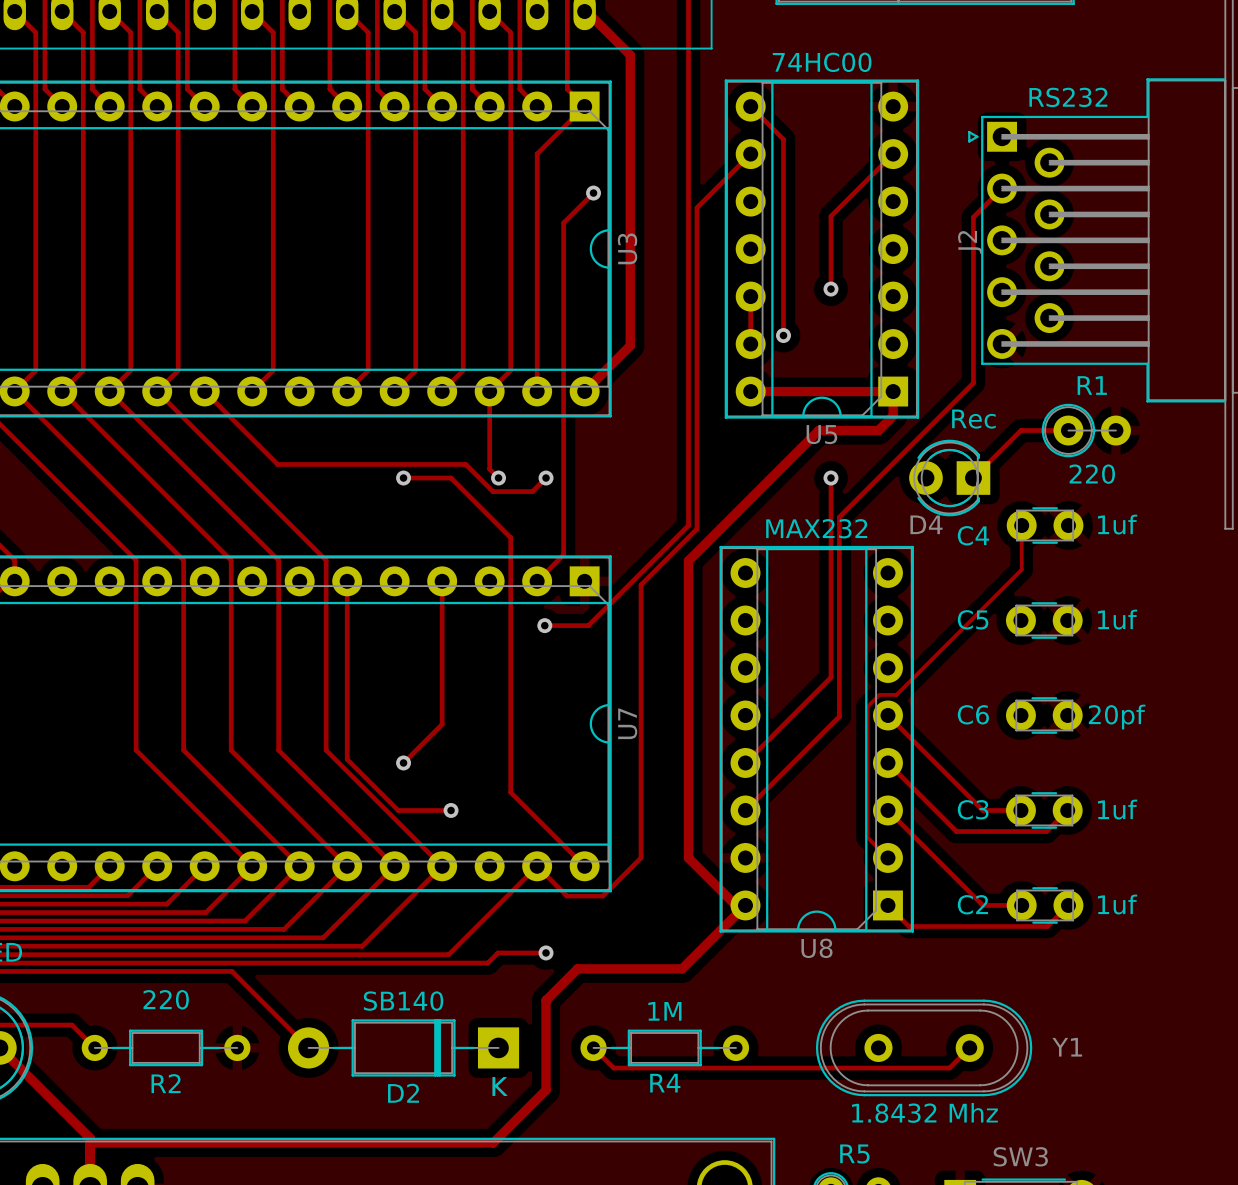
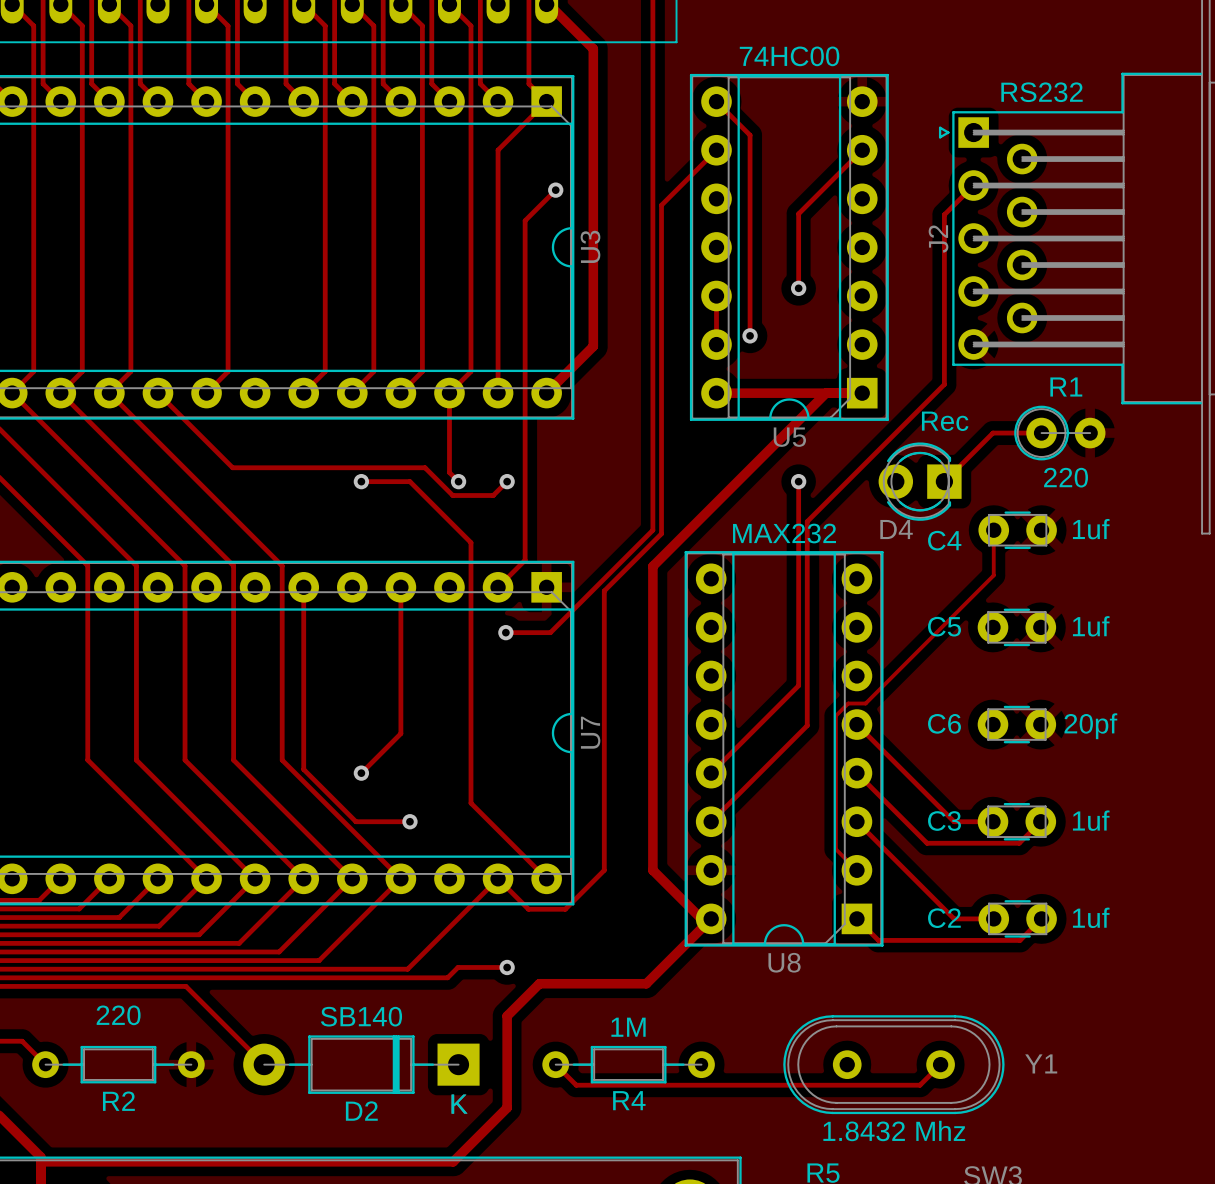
track: (893, 391) (893, 415) (878, 430) (818, 430) -> (826, 393) (786, 433)

